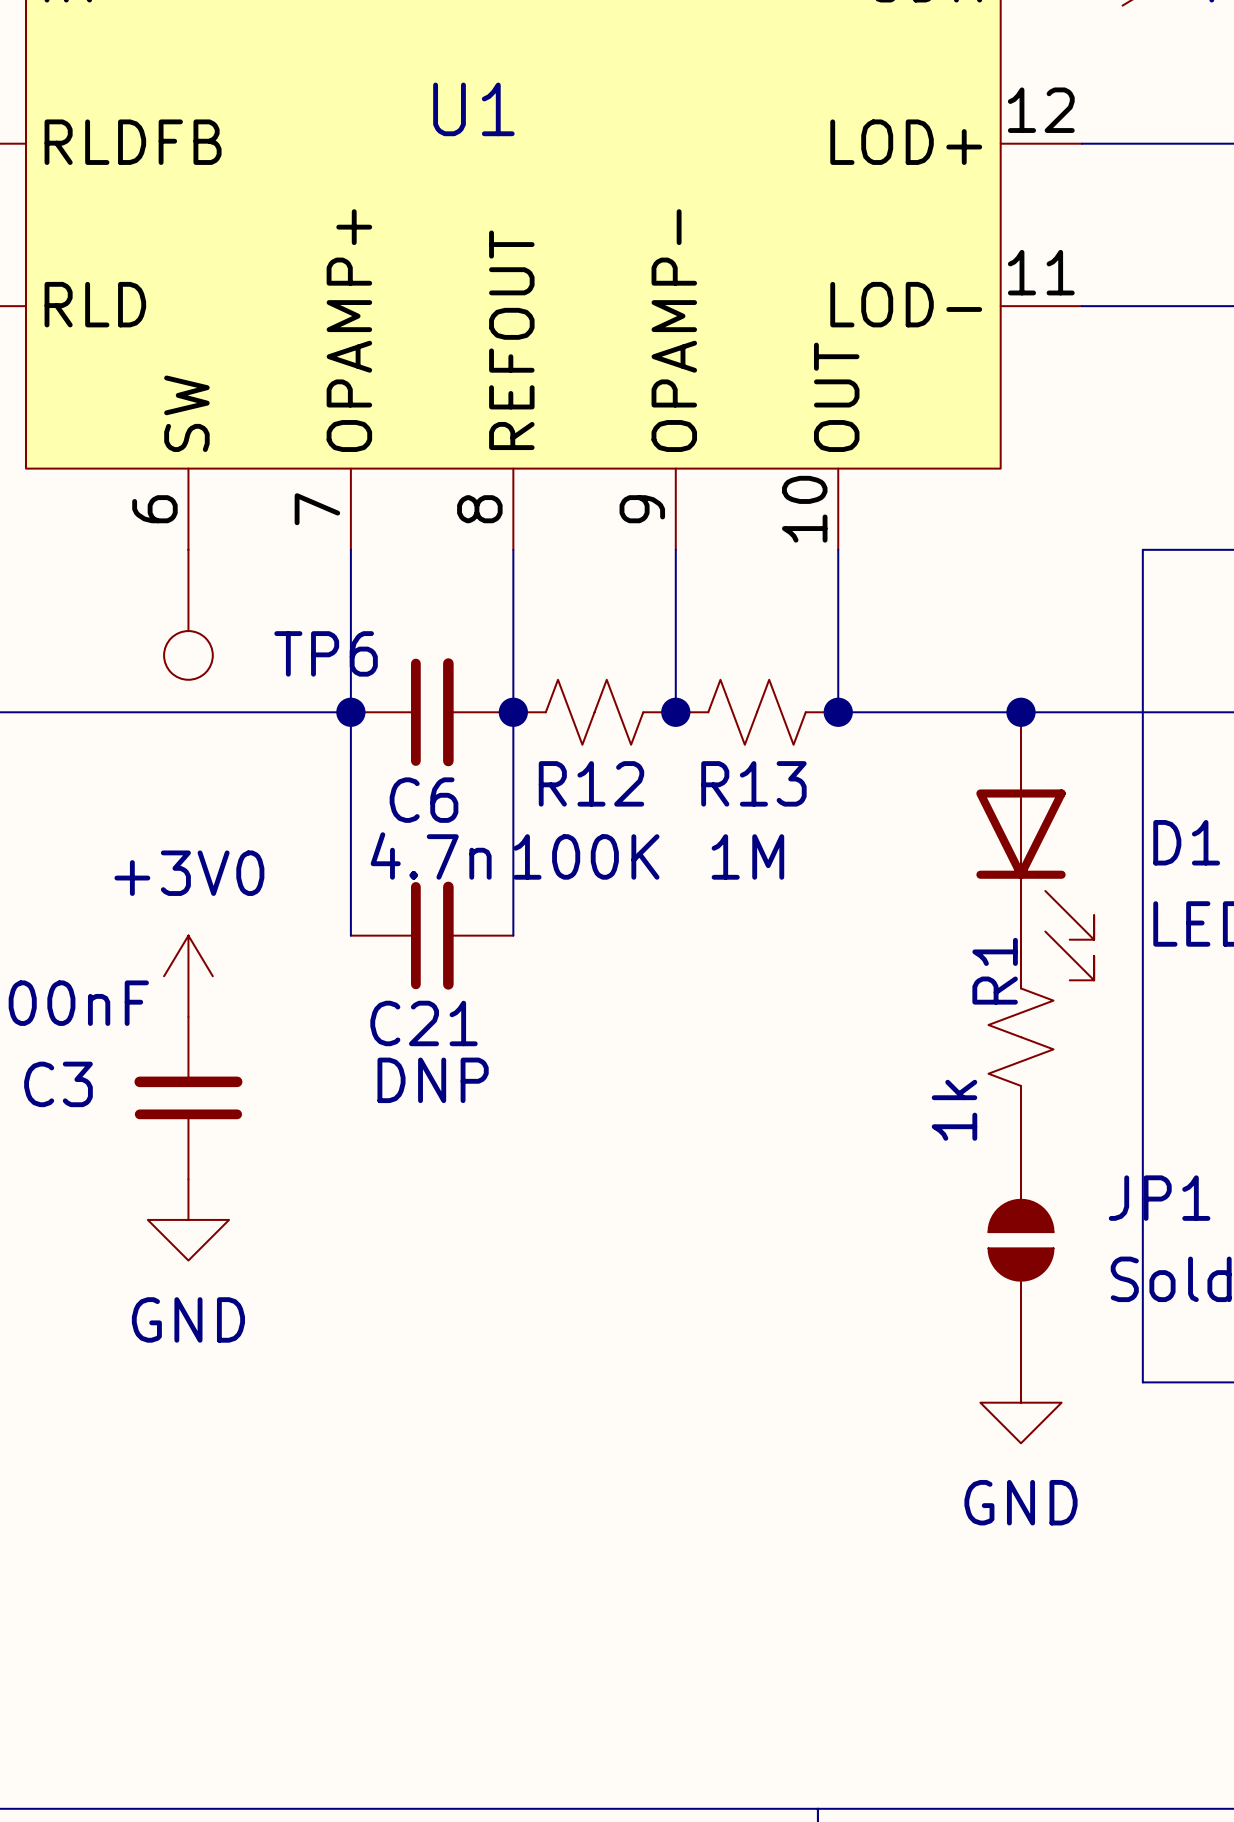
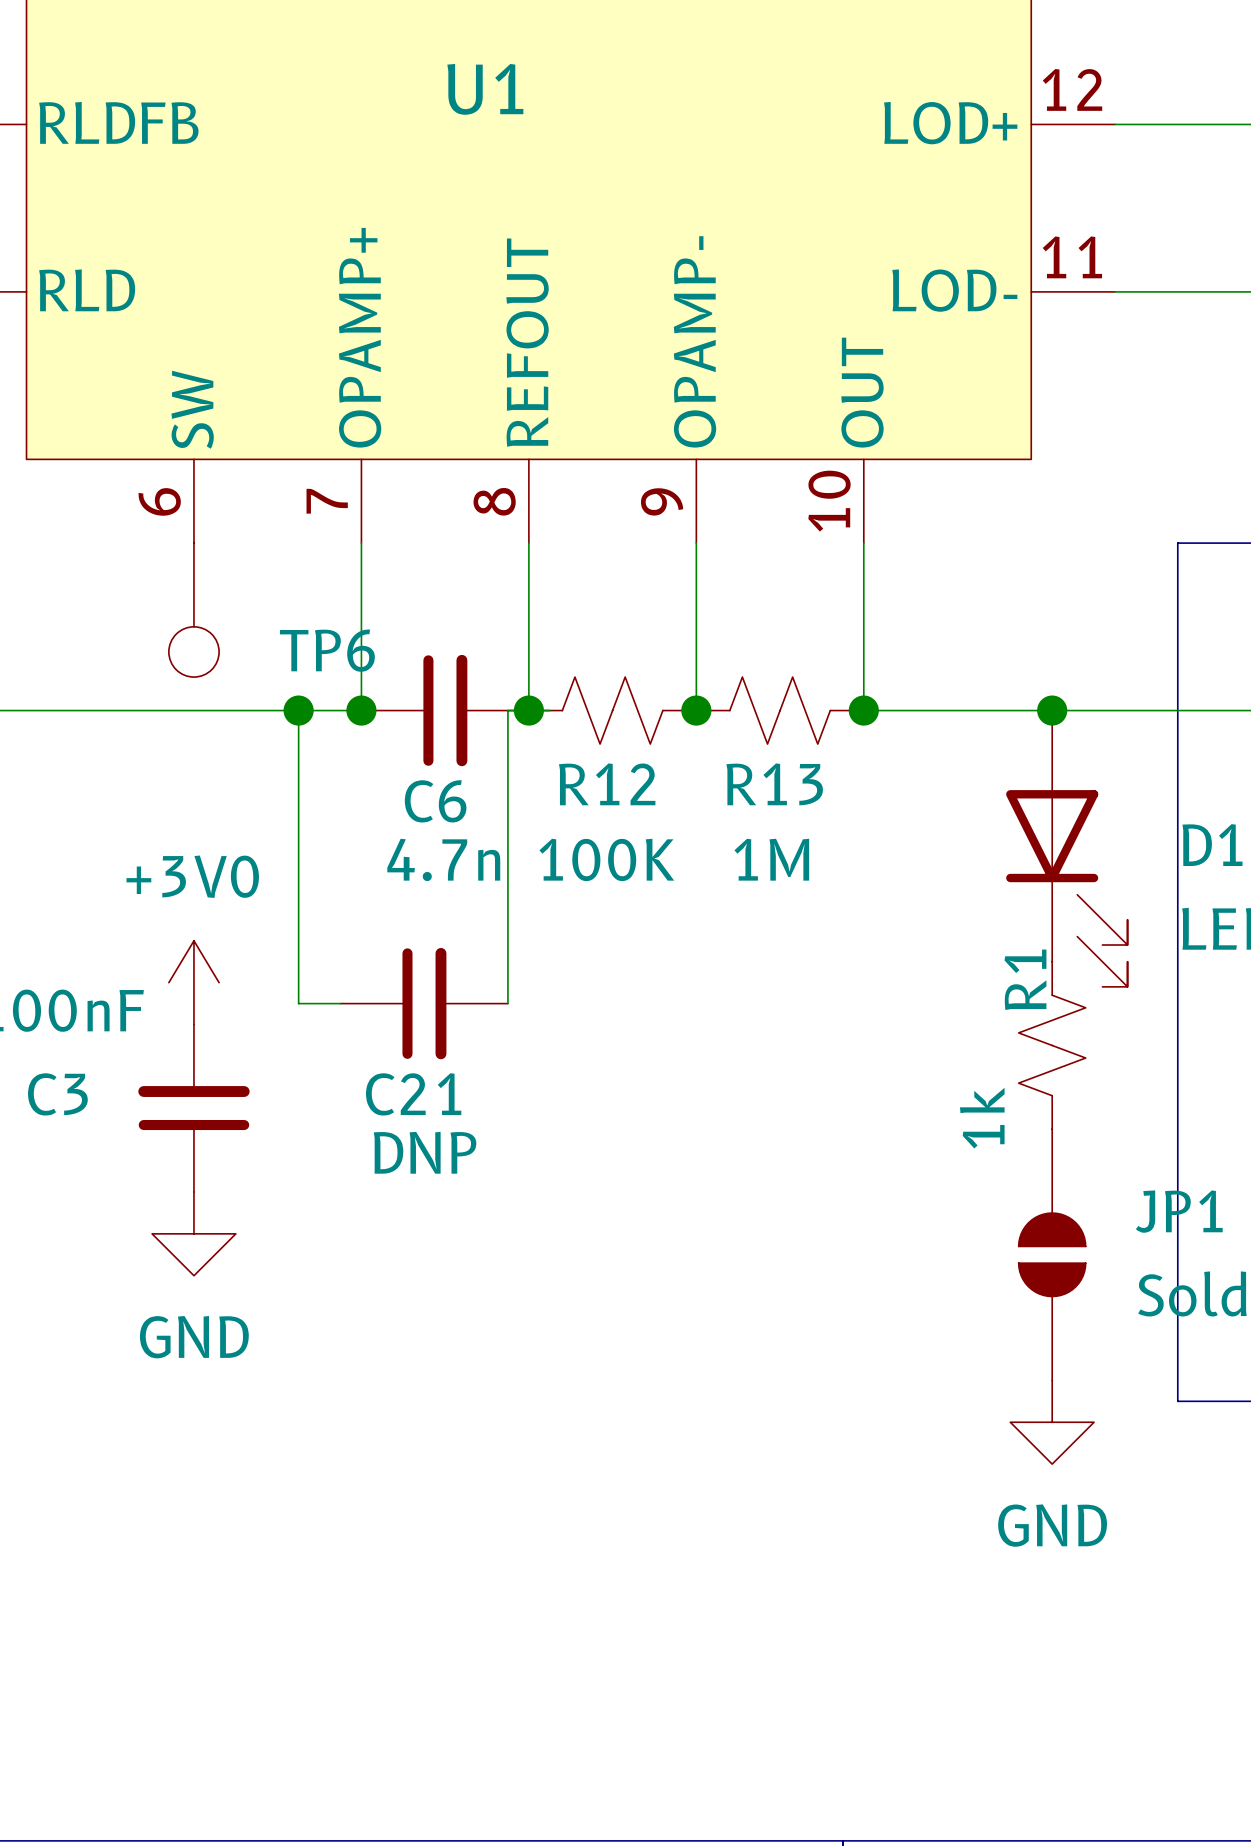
wire: none -> (298, 710) (298, 1003) (340, 1003)
junction: none -> (298, 710)
wire: (350, 712) (350, 935) -> none
wire: (513, 712) (513, 935) -> none
wire: none -> (549, 710) (507, 710) (507, 1003)
C21 position: (432, 935) -> (424, 1003)

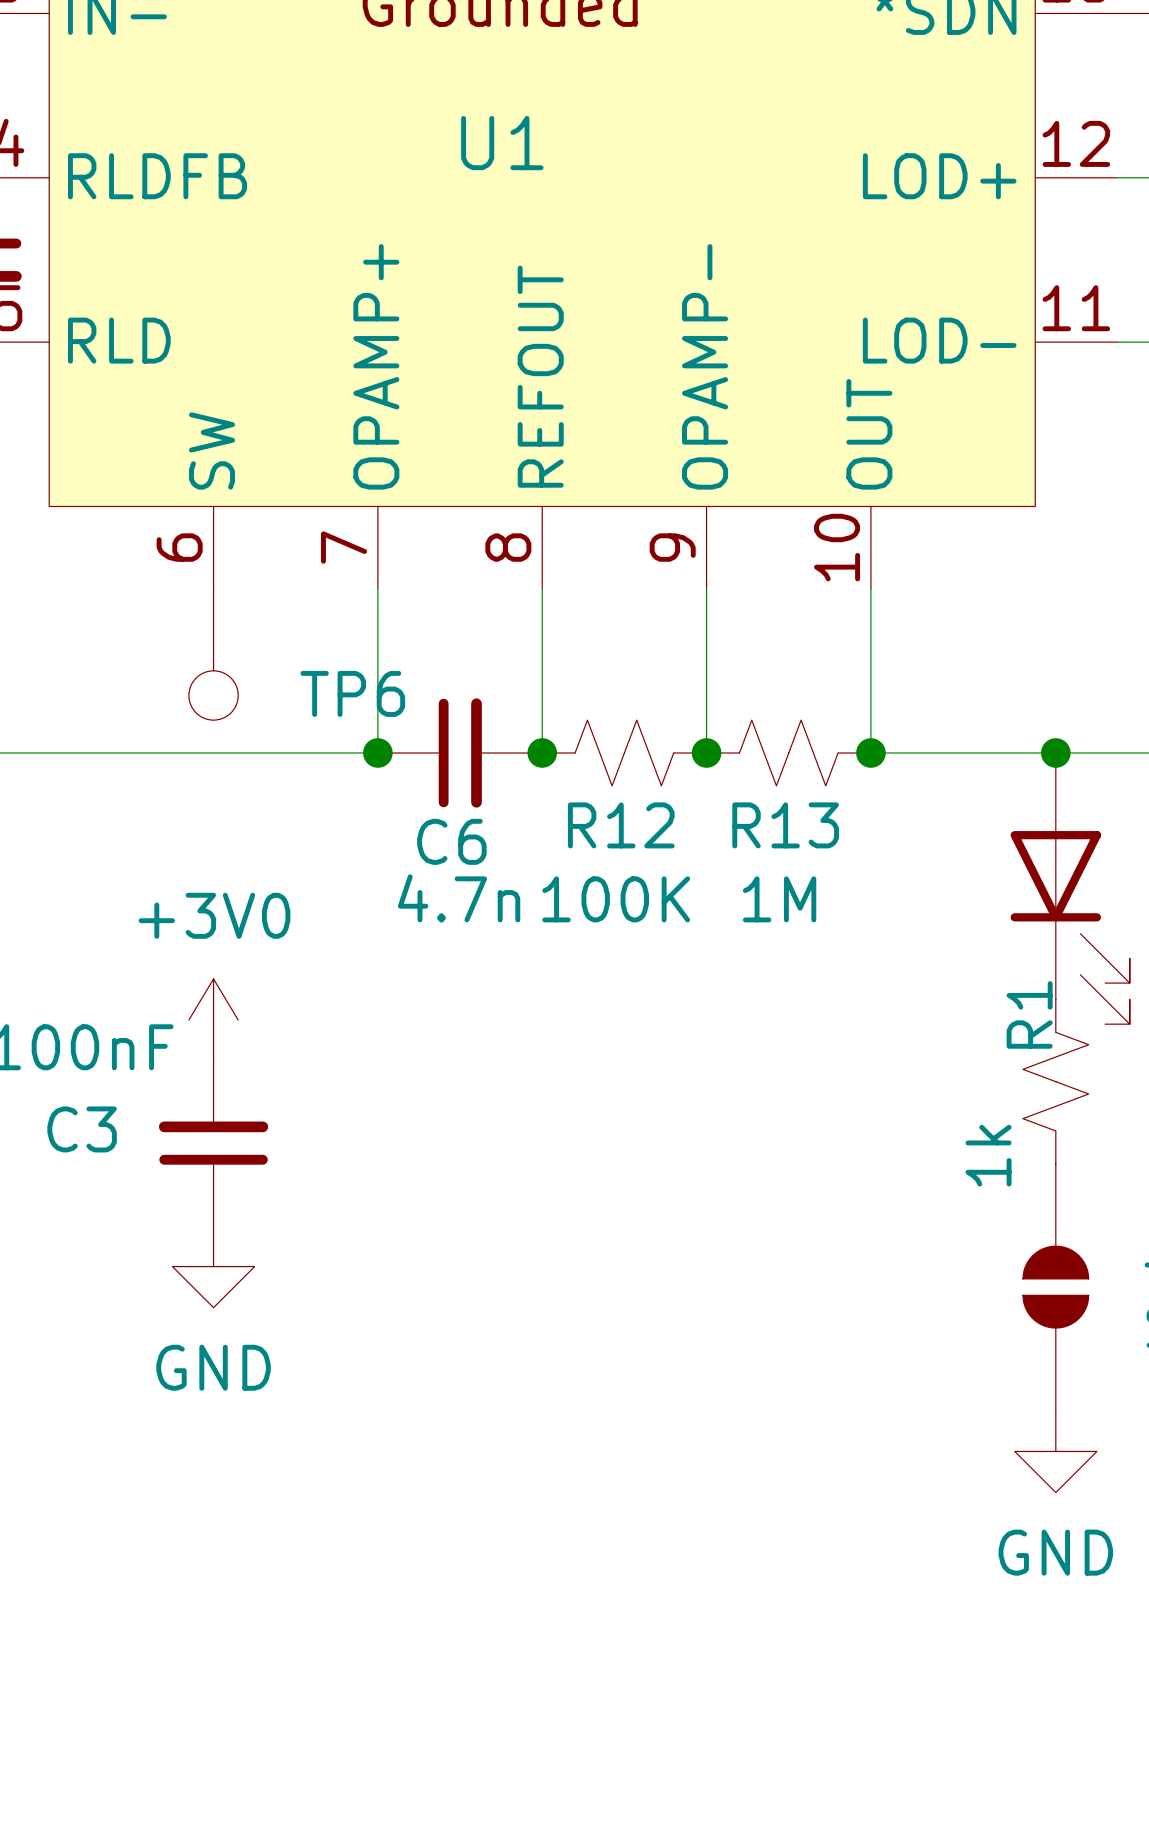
wire: (298, 710) (298, 1003) (340, 1003) -> none
junction: (298, 710) -> none
wire: (549, 710) (507, 710) (507, 1003) -> none
C21: DNP (424, 1003) -> none

